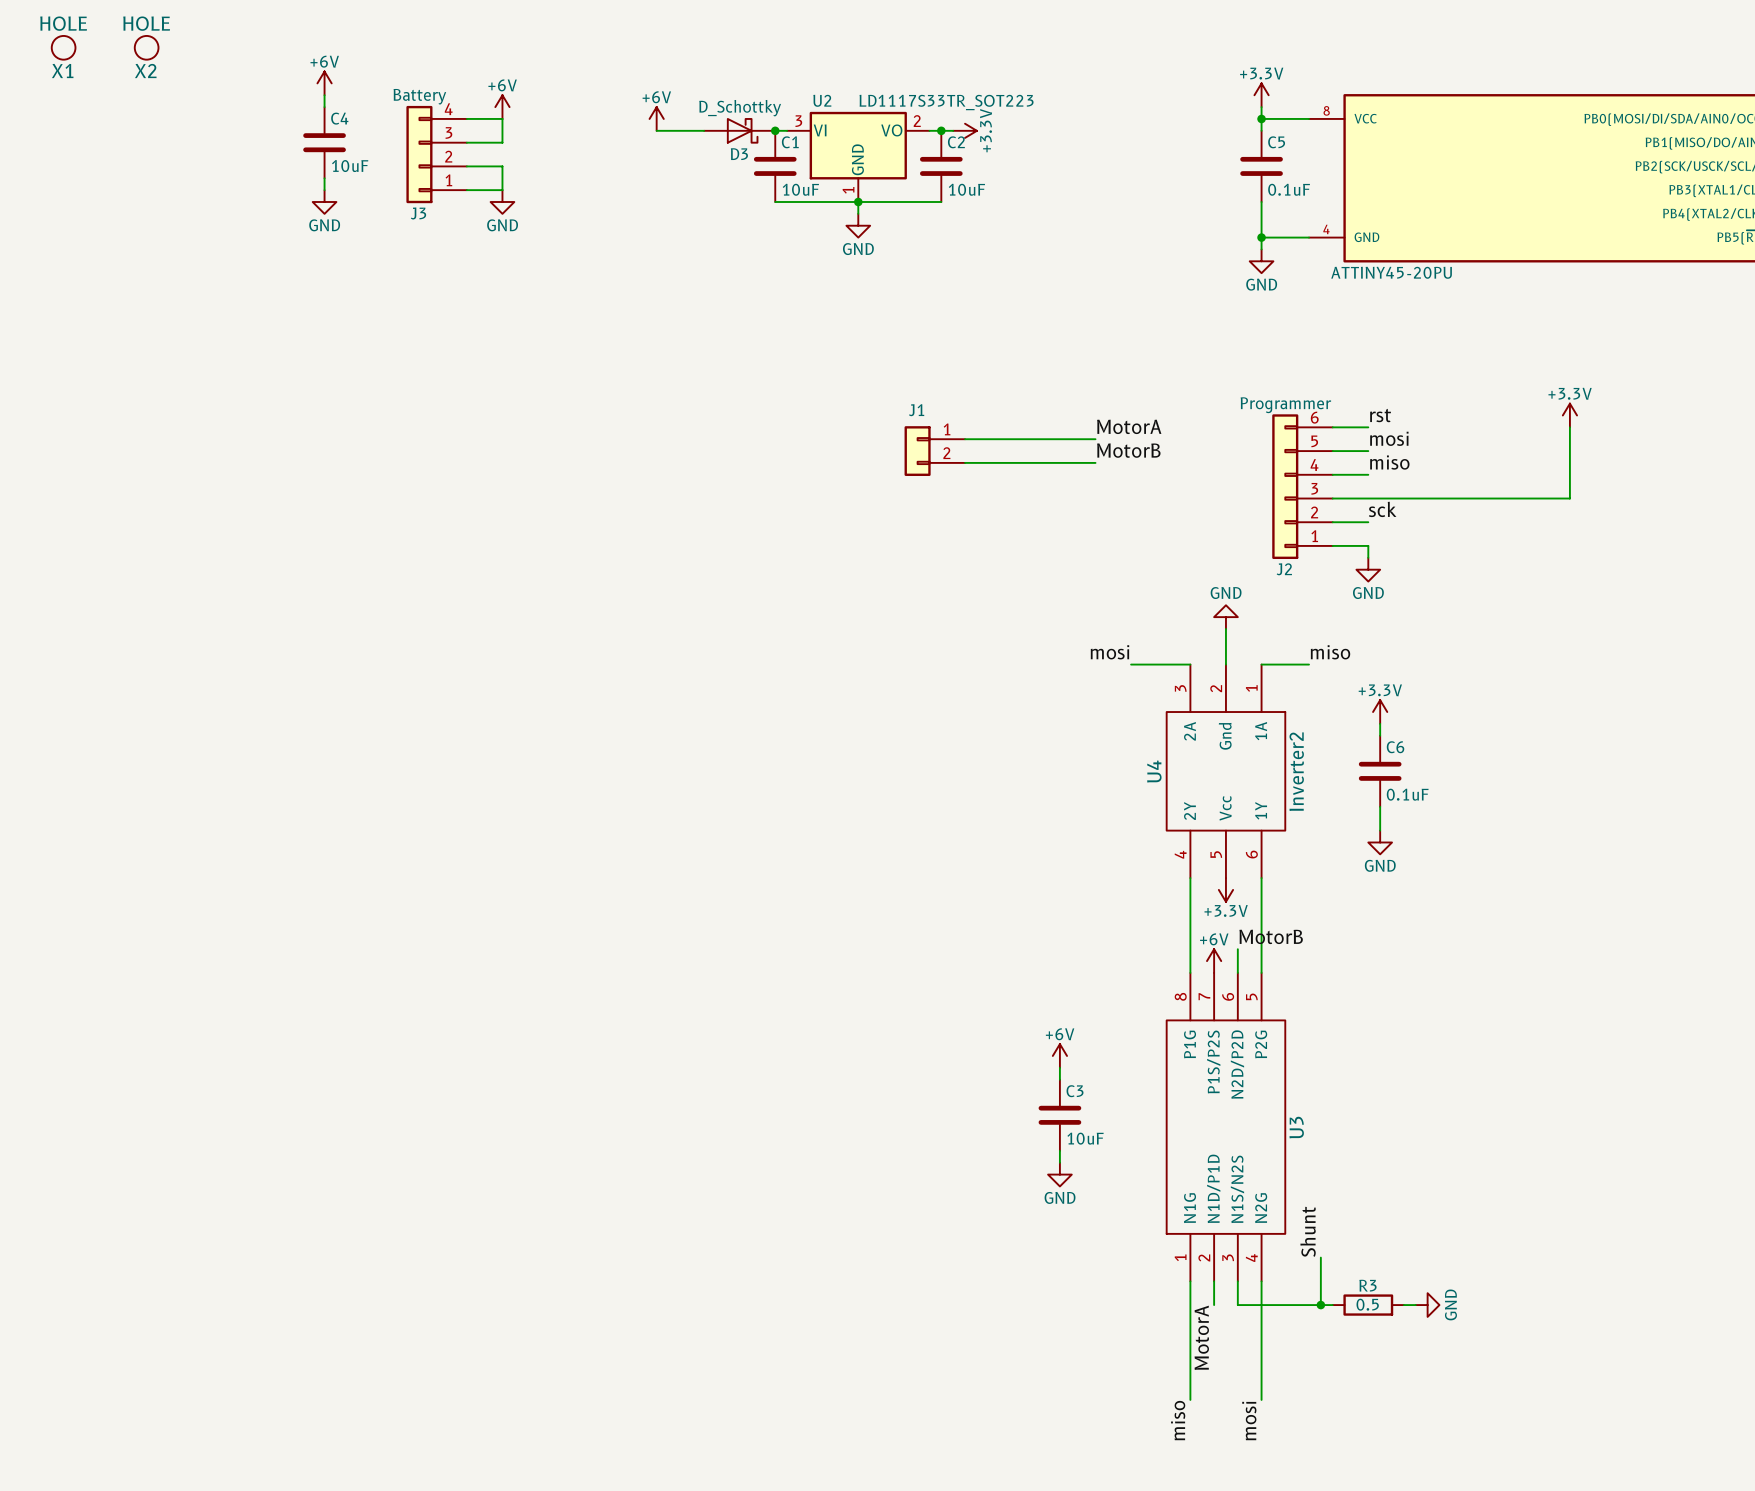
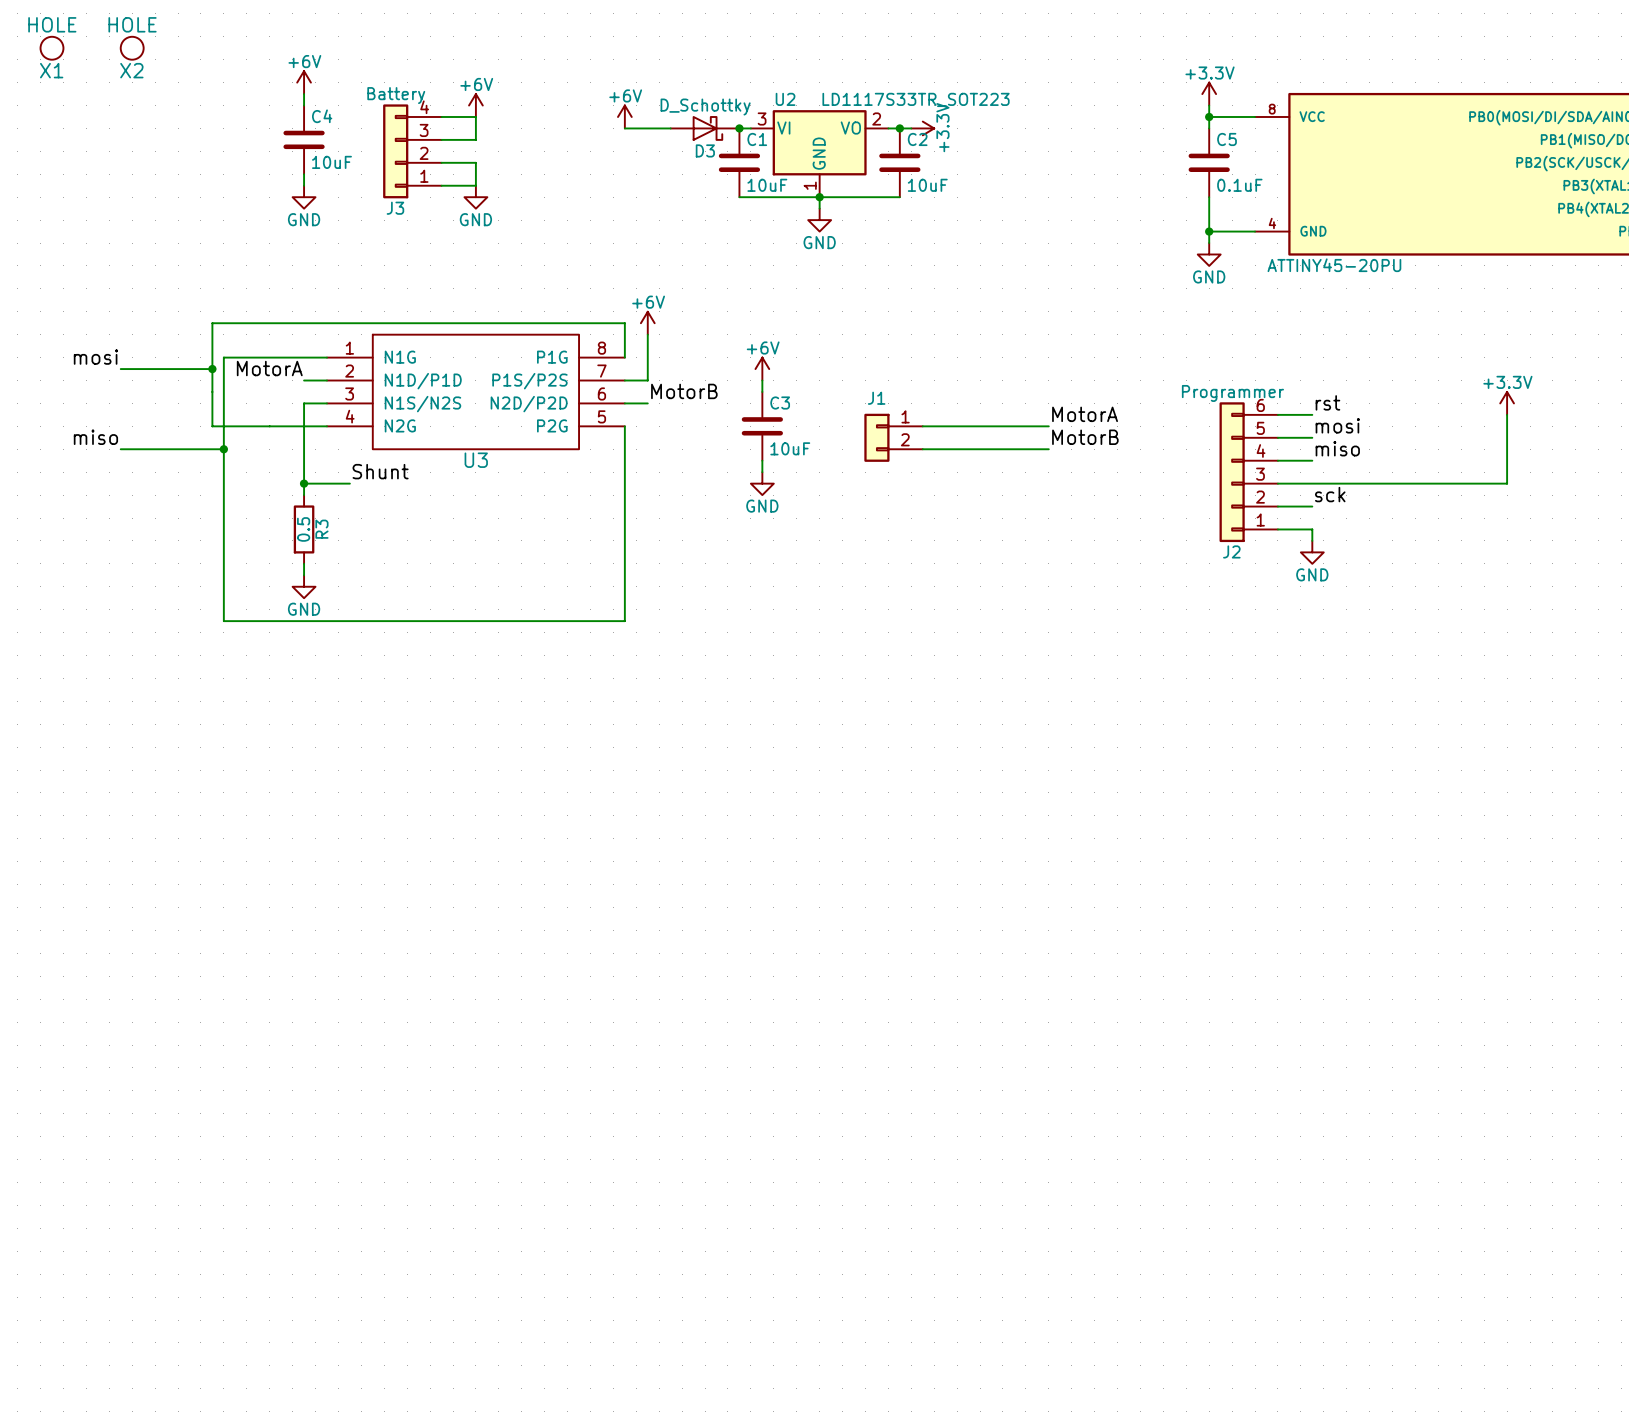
power symbol: none -> +6V (647, 323)
wire: none -> (647, 334) (647, 380) (624, 380)
label: none -> mosi (95, 357)
wire: none -> (326, 357) (223, 357) (223, 621) (624, 621) (624, 426)
wire: none -> (624, 357) (624, 323) (212, 323) (212, 426) (326, 426)
wire: none -> (120, 369) (212, 369)
junction: none -> (212, 369)
label: none -> MotorA (269, 368)
power symbol: none -> +6V (762, 369)
wire: none -> (304, 380) (326, 380)
wire: none -> (762, 380) (762, 391)
label: none -> MotorB (684, 391)
wire: none -> (326, 403) (304, 403) (304, 495)
wire: none -> (624, 403) (647, 403)
label: none -> miso (95, 437)
wire: none -> (120, 449) (223, 449)
junction: none -> (223, 449)
wire: none -> (762, 460) (762, 472)
label: none -> Shunt (380, 471)
wire: none -> (304, 483) (349, 483)
junction: none -> (304, 483)
power symbol: none -> GND (762, 483)
wire: none -> (304, 563) (304, 575)
power symbol: none -> GND (304, 586)
power symbol: GND (1225, 617) -> none
wire: (1225, 628) (1225, 664) -> none
label: mosi (1110, 652) -> none
label: miso (1330, 652) -> none
wire: (1131, 664) (1190, 664) -> none
wire: (1261, 664) (1309, 664) -> none
power symbol: +3.3V (1380, 712) -> none
wire: (1380, 723) (1380, 735) -> none
U4: Inverter2 (1225, 771) -> none
C6: 0.1uF (1380, 771) -> none
wire: (1380, 806) (1380, 830) -> none
power symbol: GND (1380, 842) -> none
wire: (1190, 878) (1190, 972) -> none
wire: (1261, 878) (1261, 972) -> none
power symbol: +3.3V (1225, 889) -> none
label: MotorB (1271, 936) -> none
wire: (1237, 949) (1237, 972) -> none
power symbol: +6V (1214, 961) -> none
power symbol: +6V (1059, 1055) -> none
wire: (1059, 1067) (1059, 1079) -> none
C3 position: (1059, 1115) -> (762, 426)
U3 rotation: 0° (1225, 1127) -> 90° clockwise (475, 391)
U3 position: (1225, 1127) -> (475, 391)
wire: (1059, 1150) (1059, 1162) -> none
power symbol: GND (1059, 1174) -> none
label: Shunt (1308, 1231) -> none
wire: (1320, 1257) (1320, 1305) -> none
wire: (1190, 1281) (1190, 1399) -> none
wire: (1214, 1281) (1214, 1305) -> none
wire: (1237, 1281) (1237, 1305) (1332, 1305) -> none
wire: (1261, 1281) (1261, 1399) -> none
junction: (1320, 1305) -> none
R3 rotation: 0° (1368, 1305) -> 90° clockwise (304, 529)
R3 position: (1368, 1305) -> (304, 529)
wire: (1403, 1305) (1415, 1305) -> none
power symbol: GND (1427, 1305) -> none
label: MotorA (1201, 1337) -> none
label: miso (1178, 1420) -> none
label: mosi (1249, 1421) -> none

